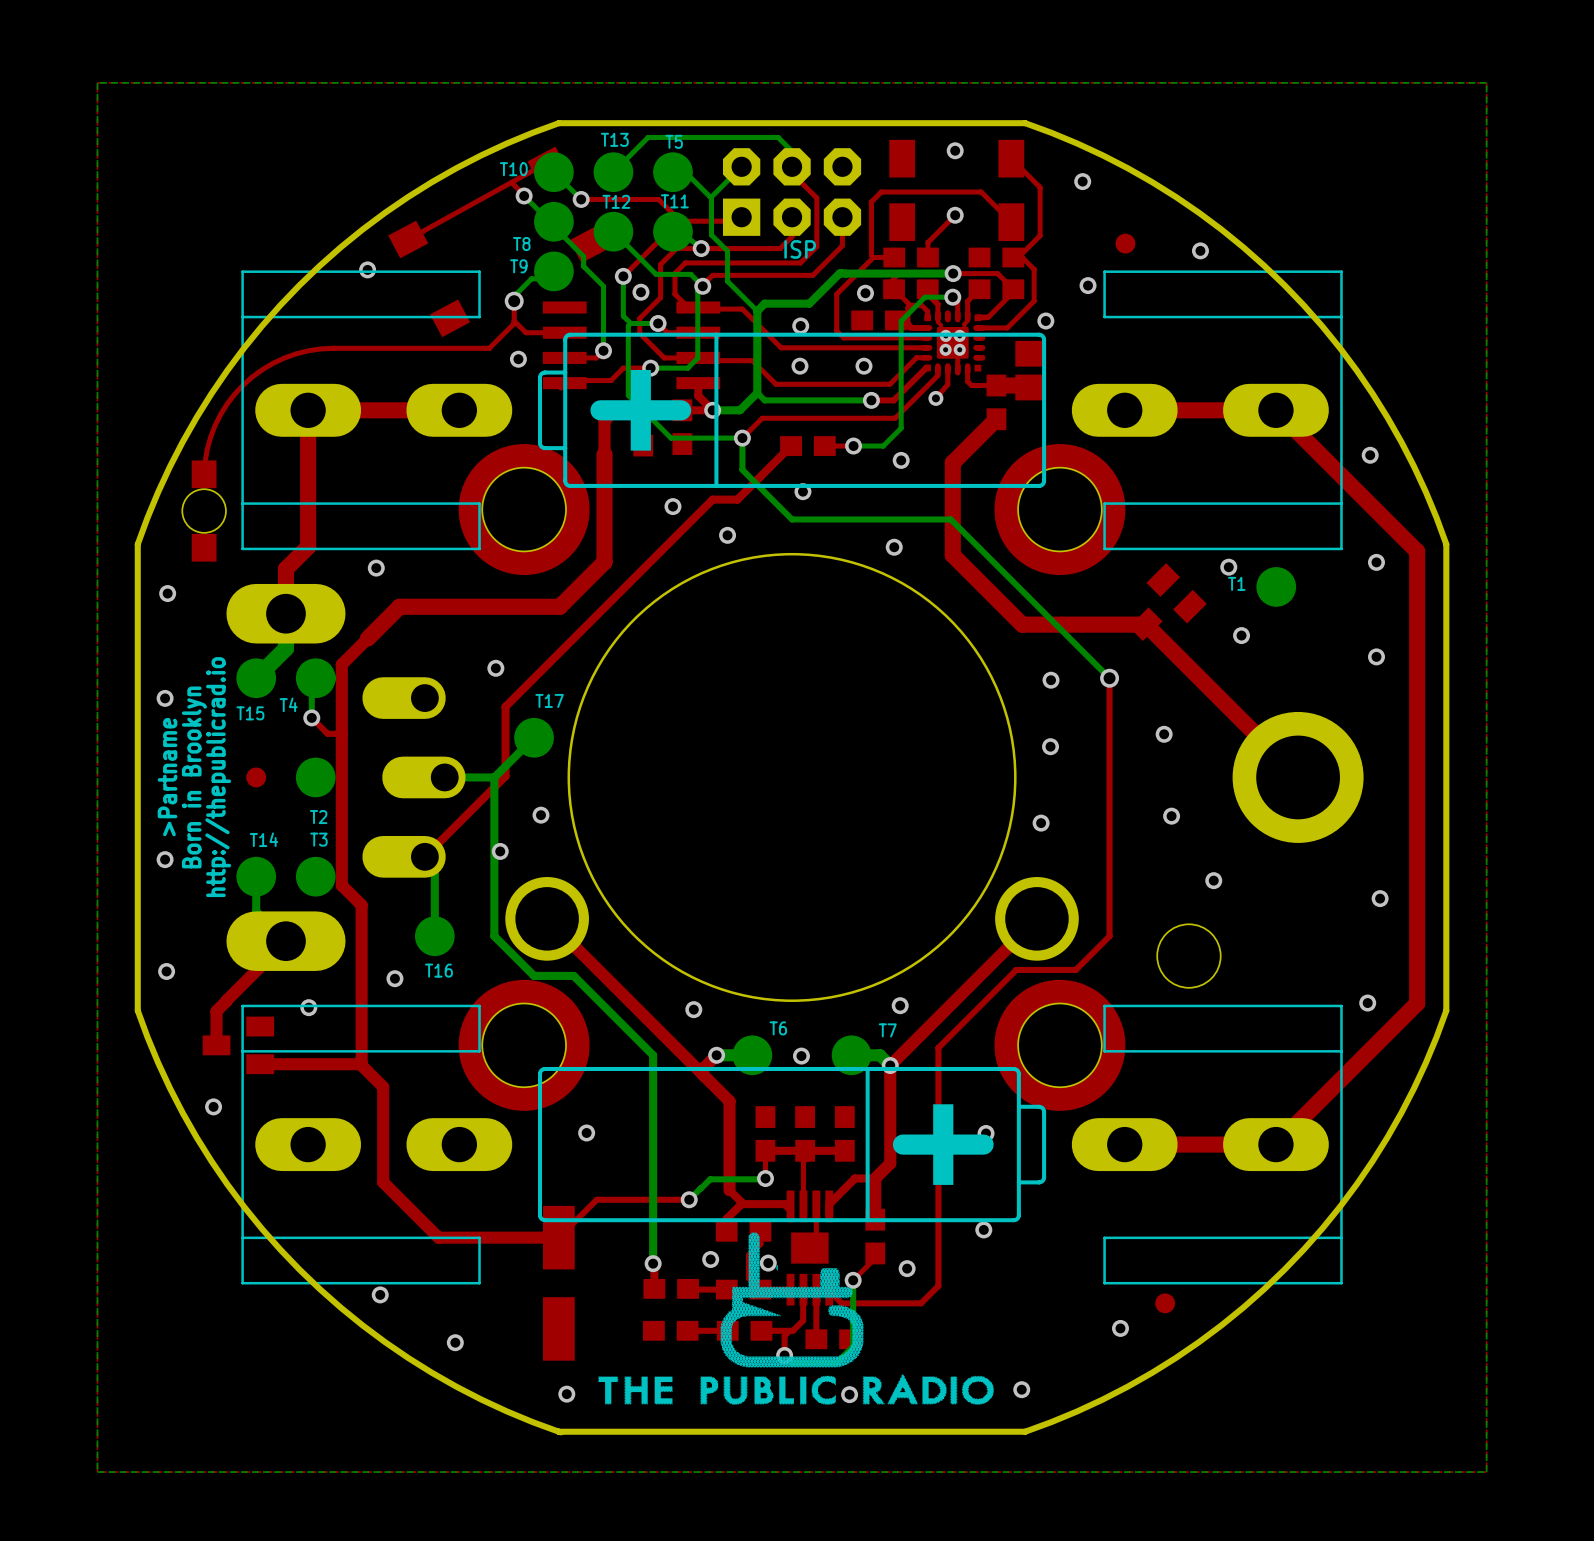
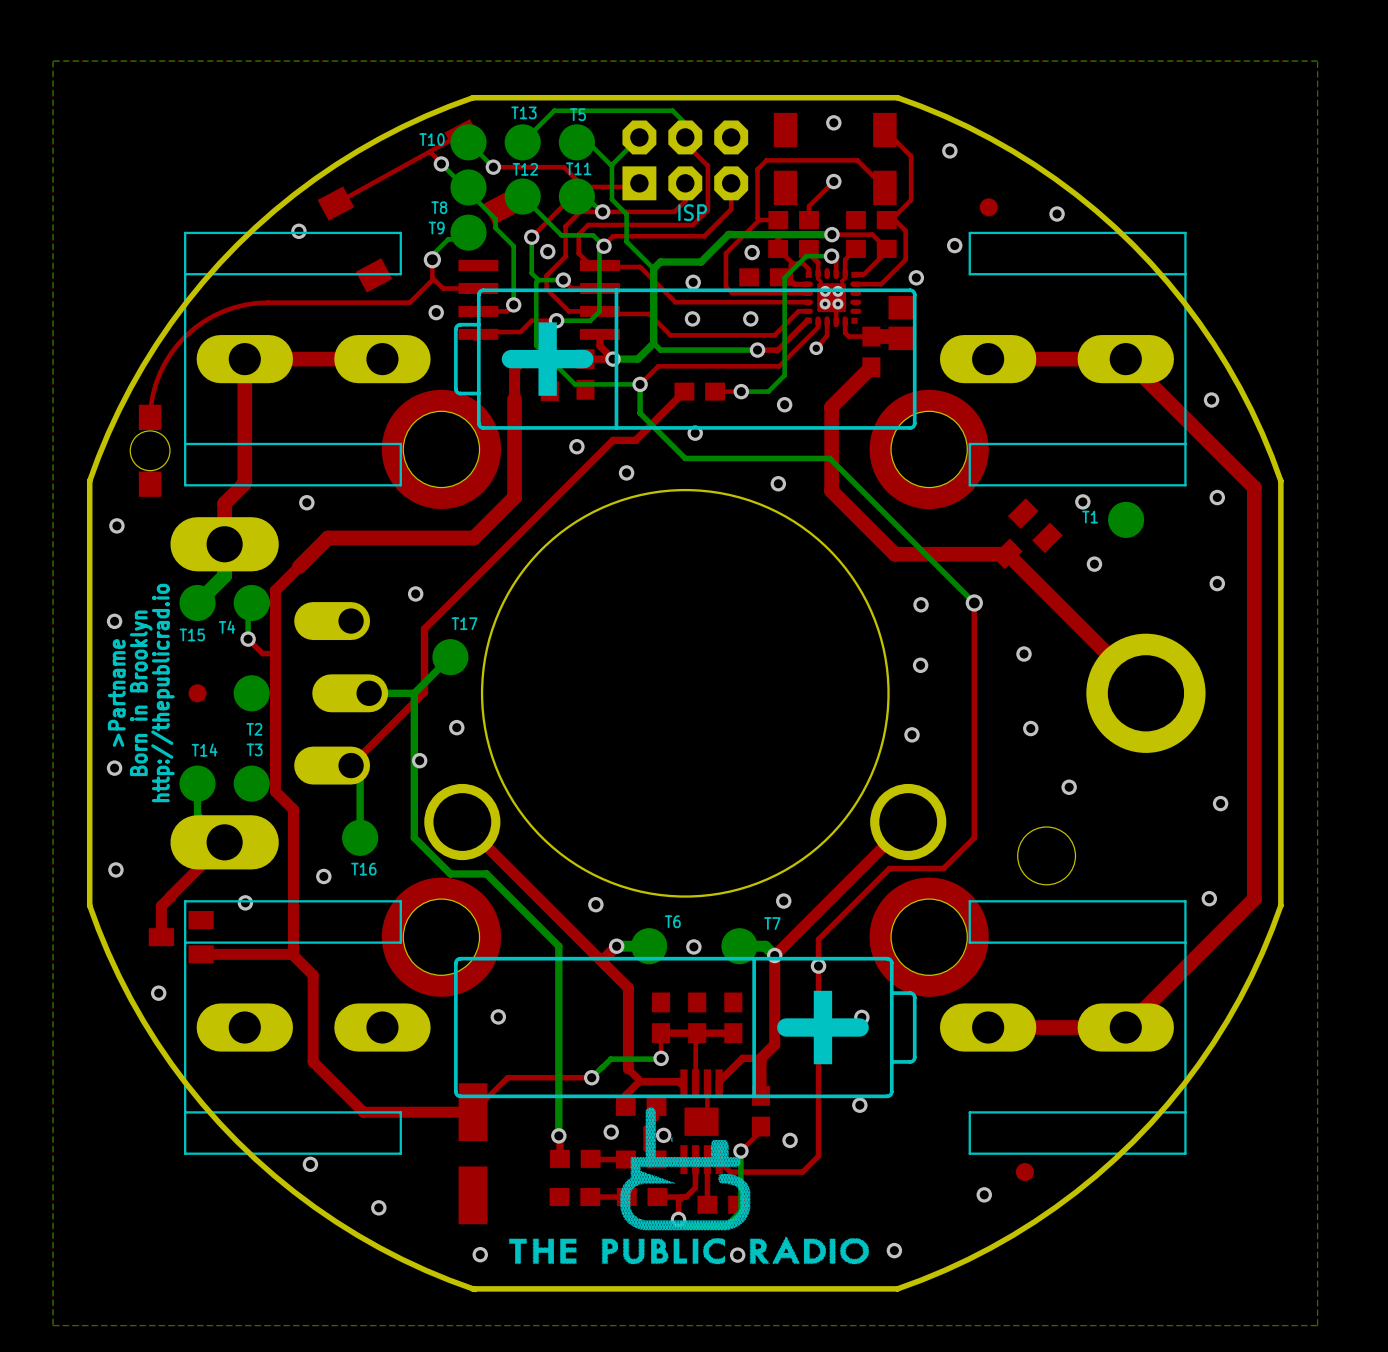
via: none -> (818, 966)

